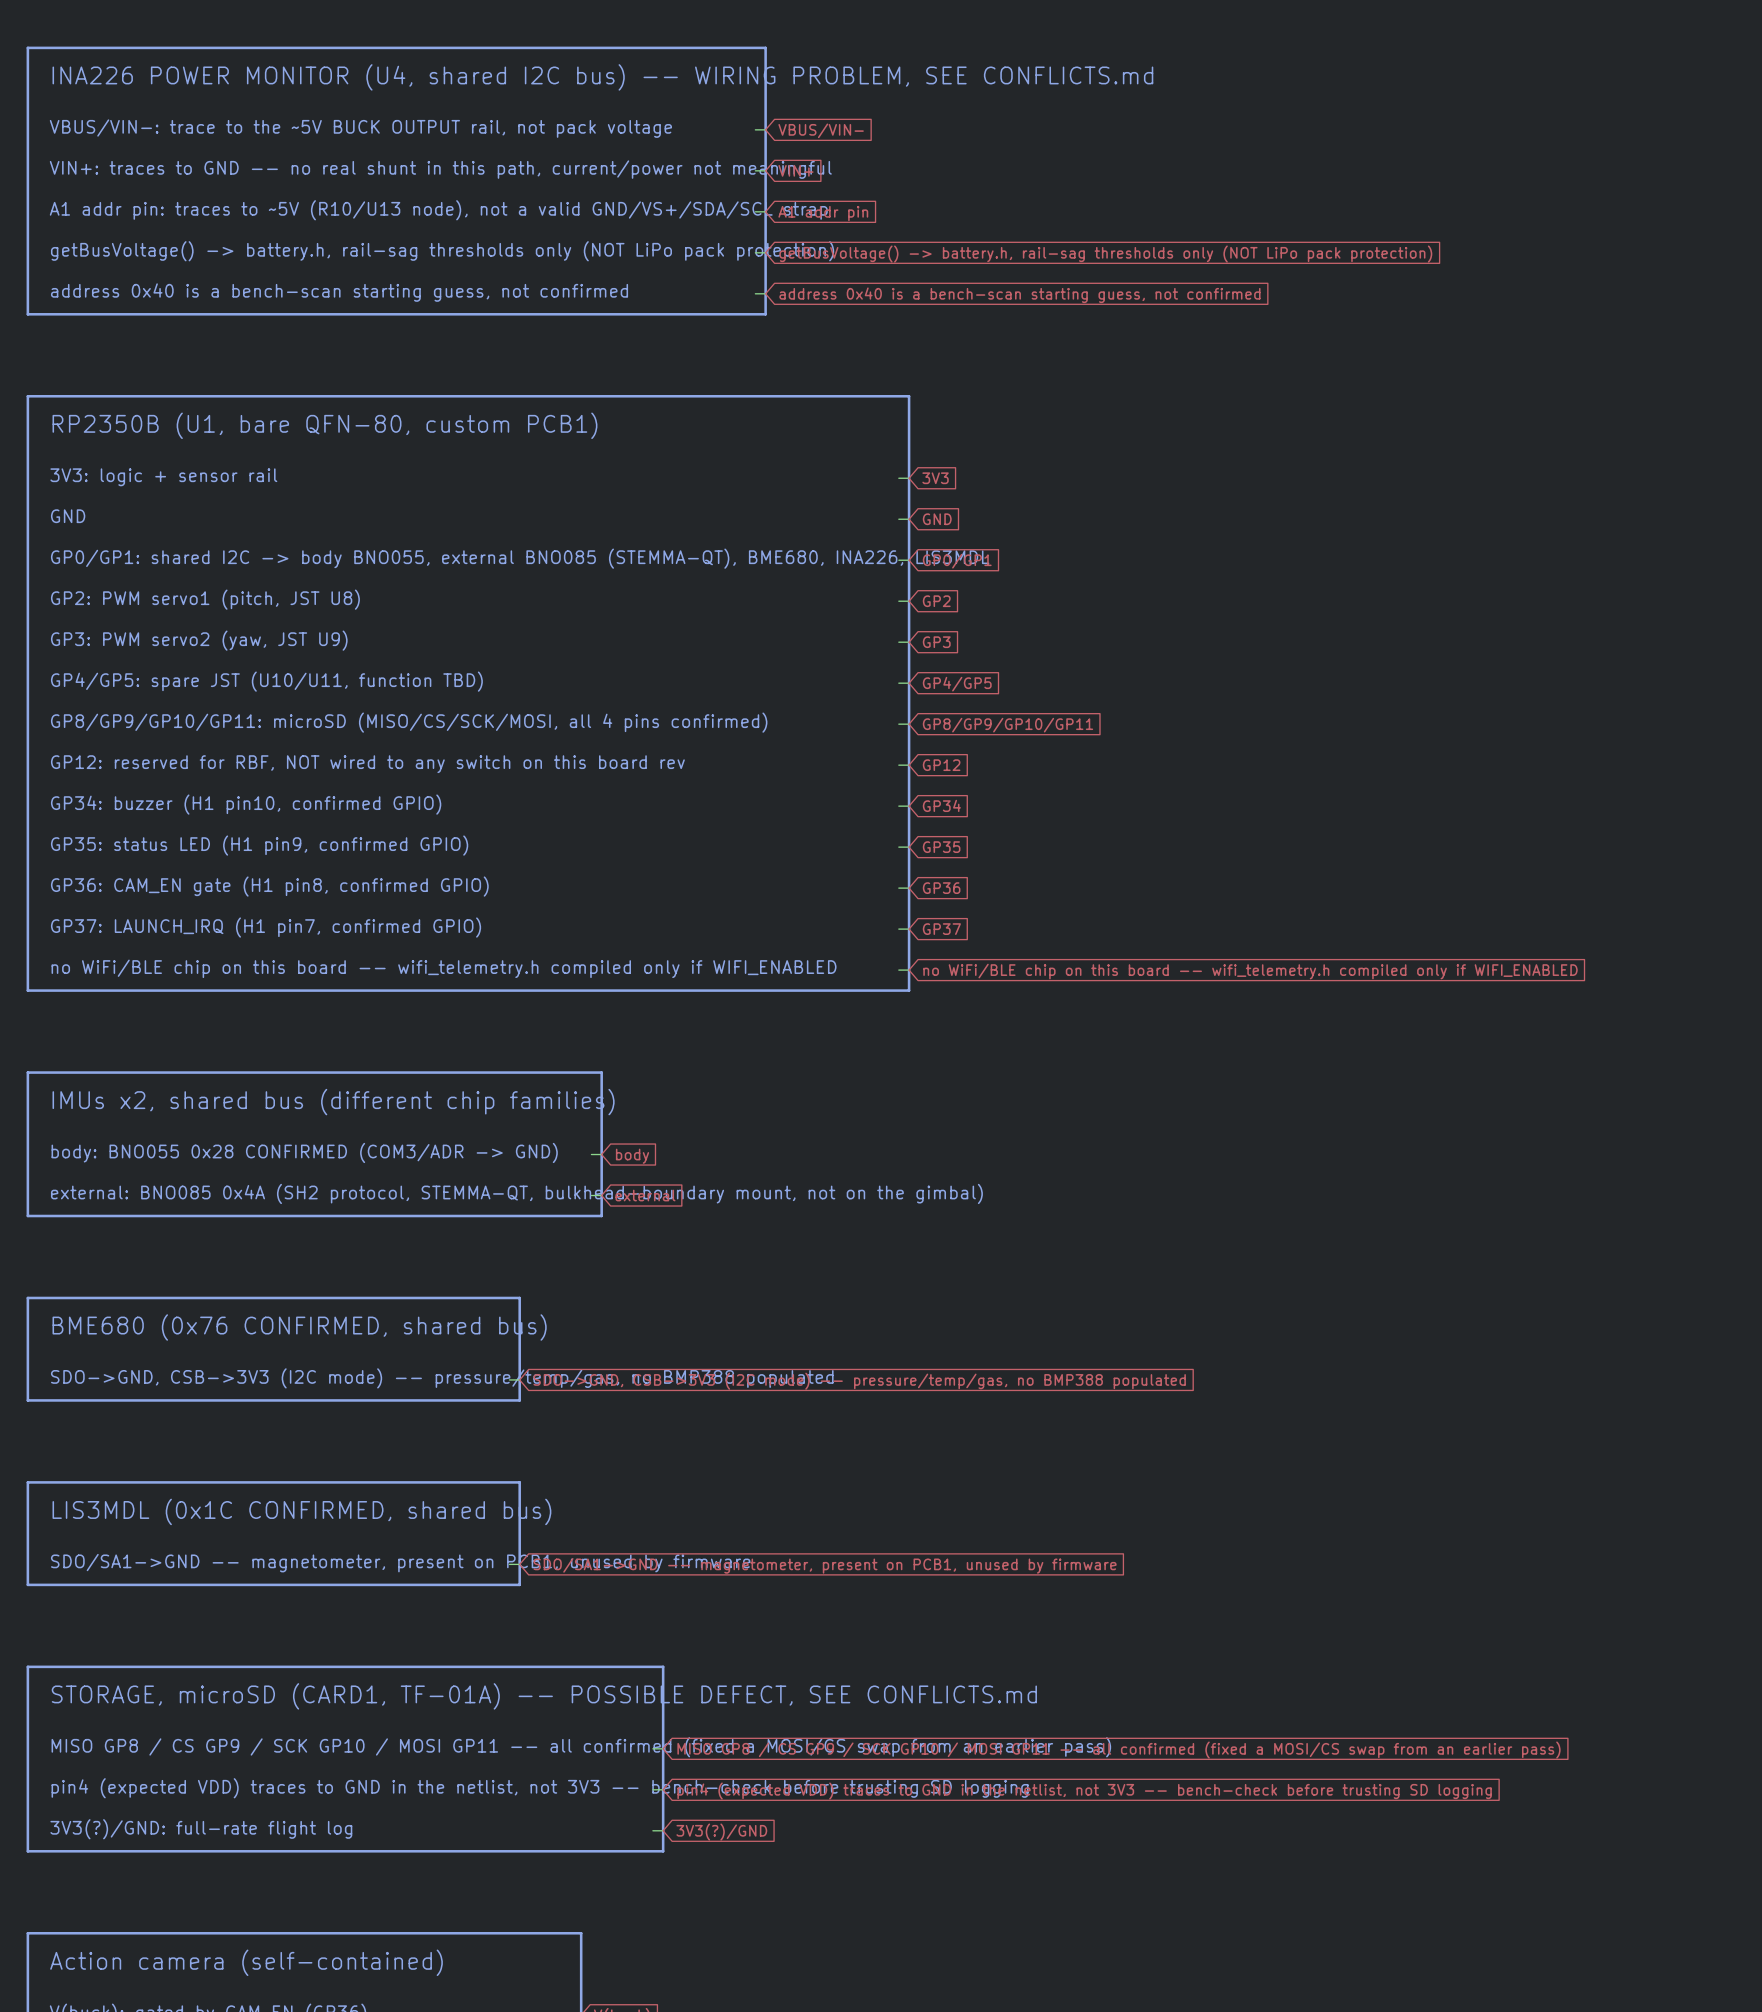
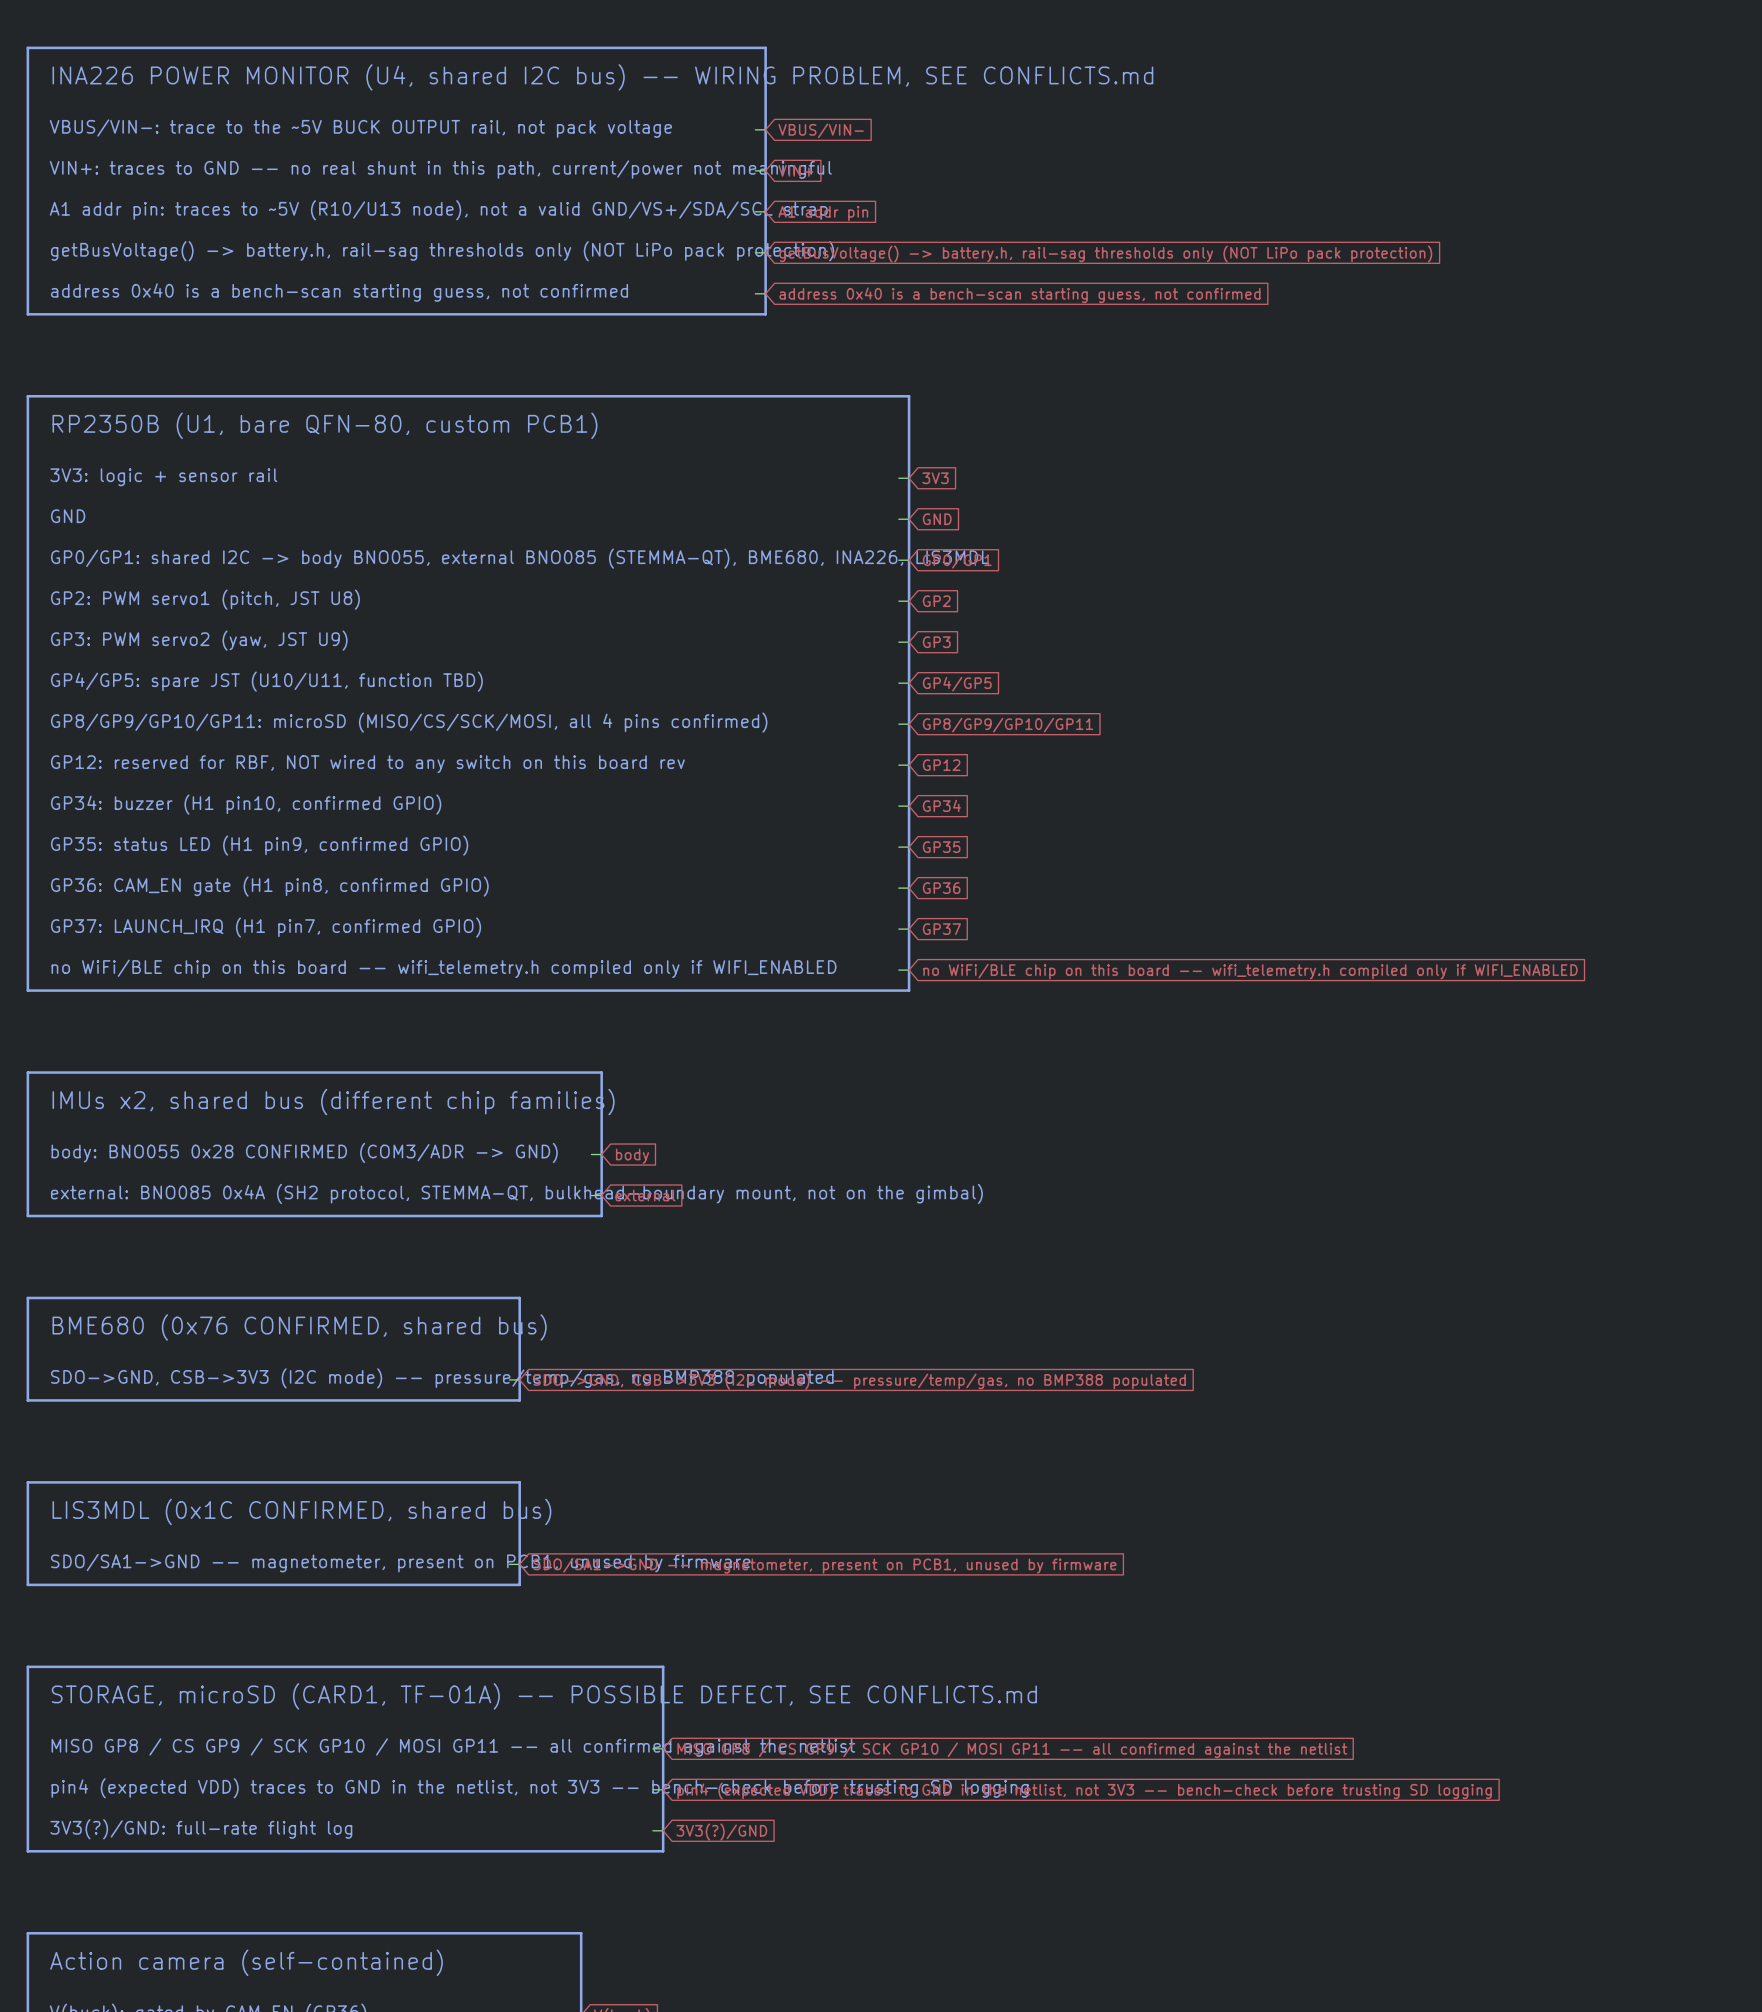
text: MISO GP8 / CS GP9 / SCK GP10 / MOSI GP11 -- all confirmed (fixed a MOSI/CS swap from an earlier pass) (581, 1747) -> MISO GP8 / CS GP9 / SCK GP10 / MOSI GP11 -- all confirmed against the netlist (453, 1747)
global label: MISO GP8 / CS GP9 / SCK GP10 / MOSI GP11 -- all confirmed (fixed a MOSI/CS swap from an earlier pass) (1119, 1750) -> MISO GP8 / CS GP9 / SCK GP10 / MOSI GP11 -- all confirmed against the netlist (1012, 1750)

